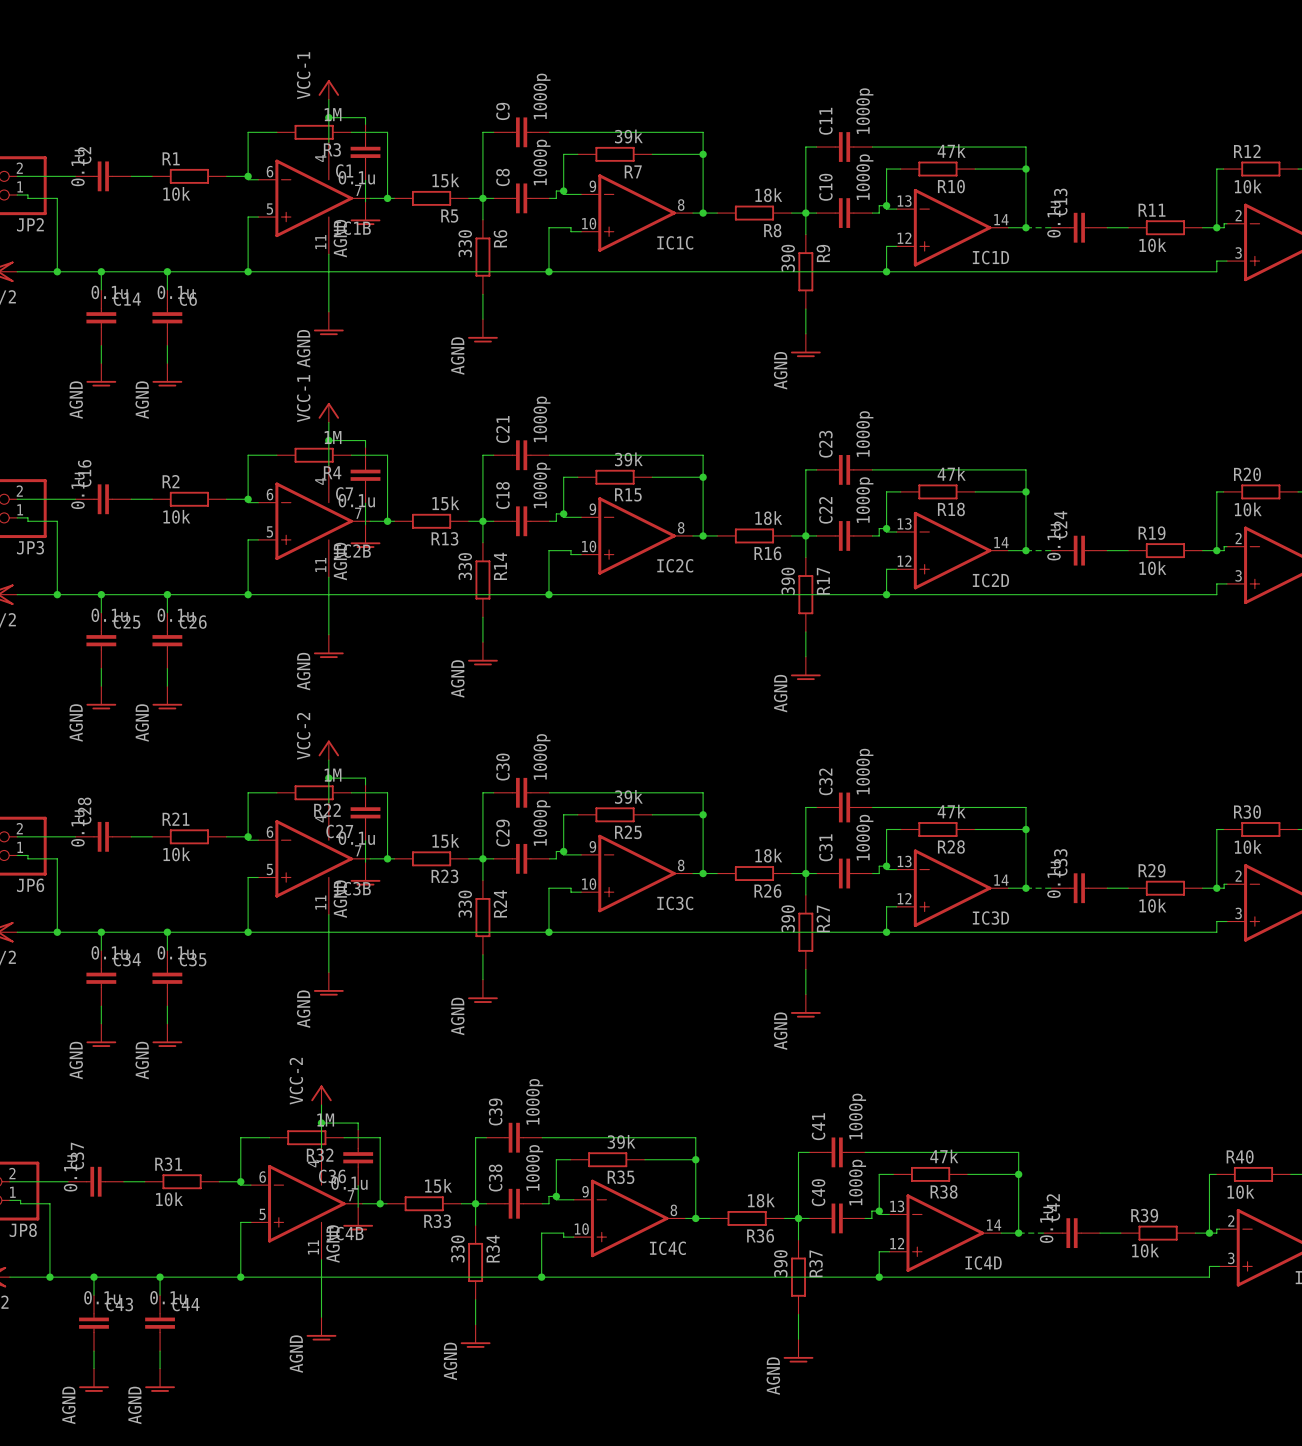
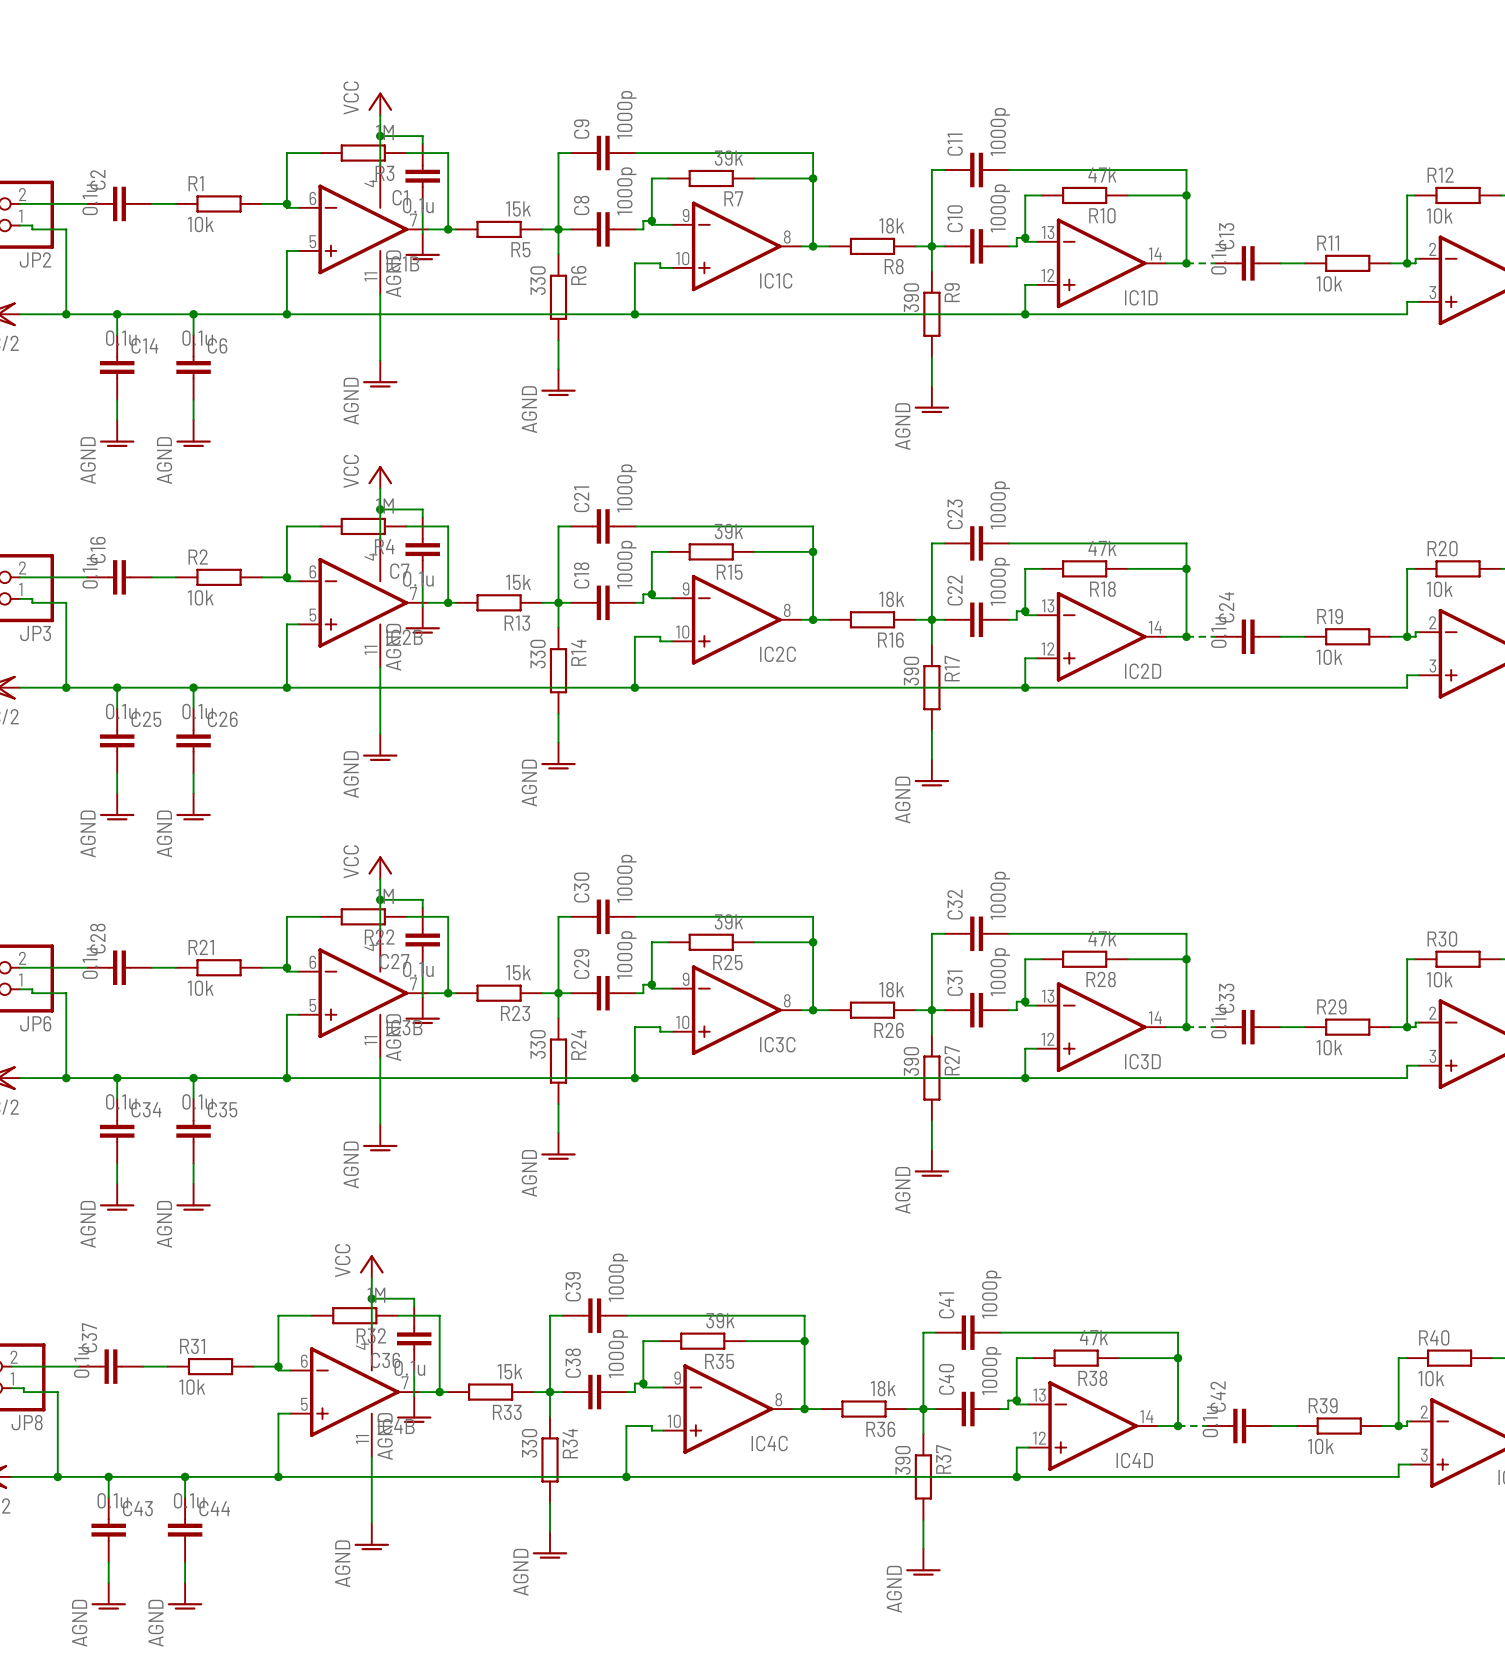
power symbol: VCC-1 (328, 89) -> VCC (380, 103)
power symbol: VCC-1 (328, 412) -> VCC (380, 477)
power symbol: VCC-2 (328, 750) -> VCC (380, 867)
power symbol: VCC-2 (321, 1095) -> VCC (371, 1266)

